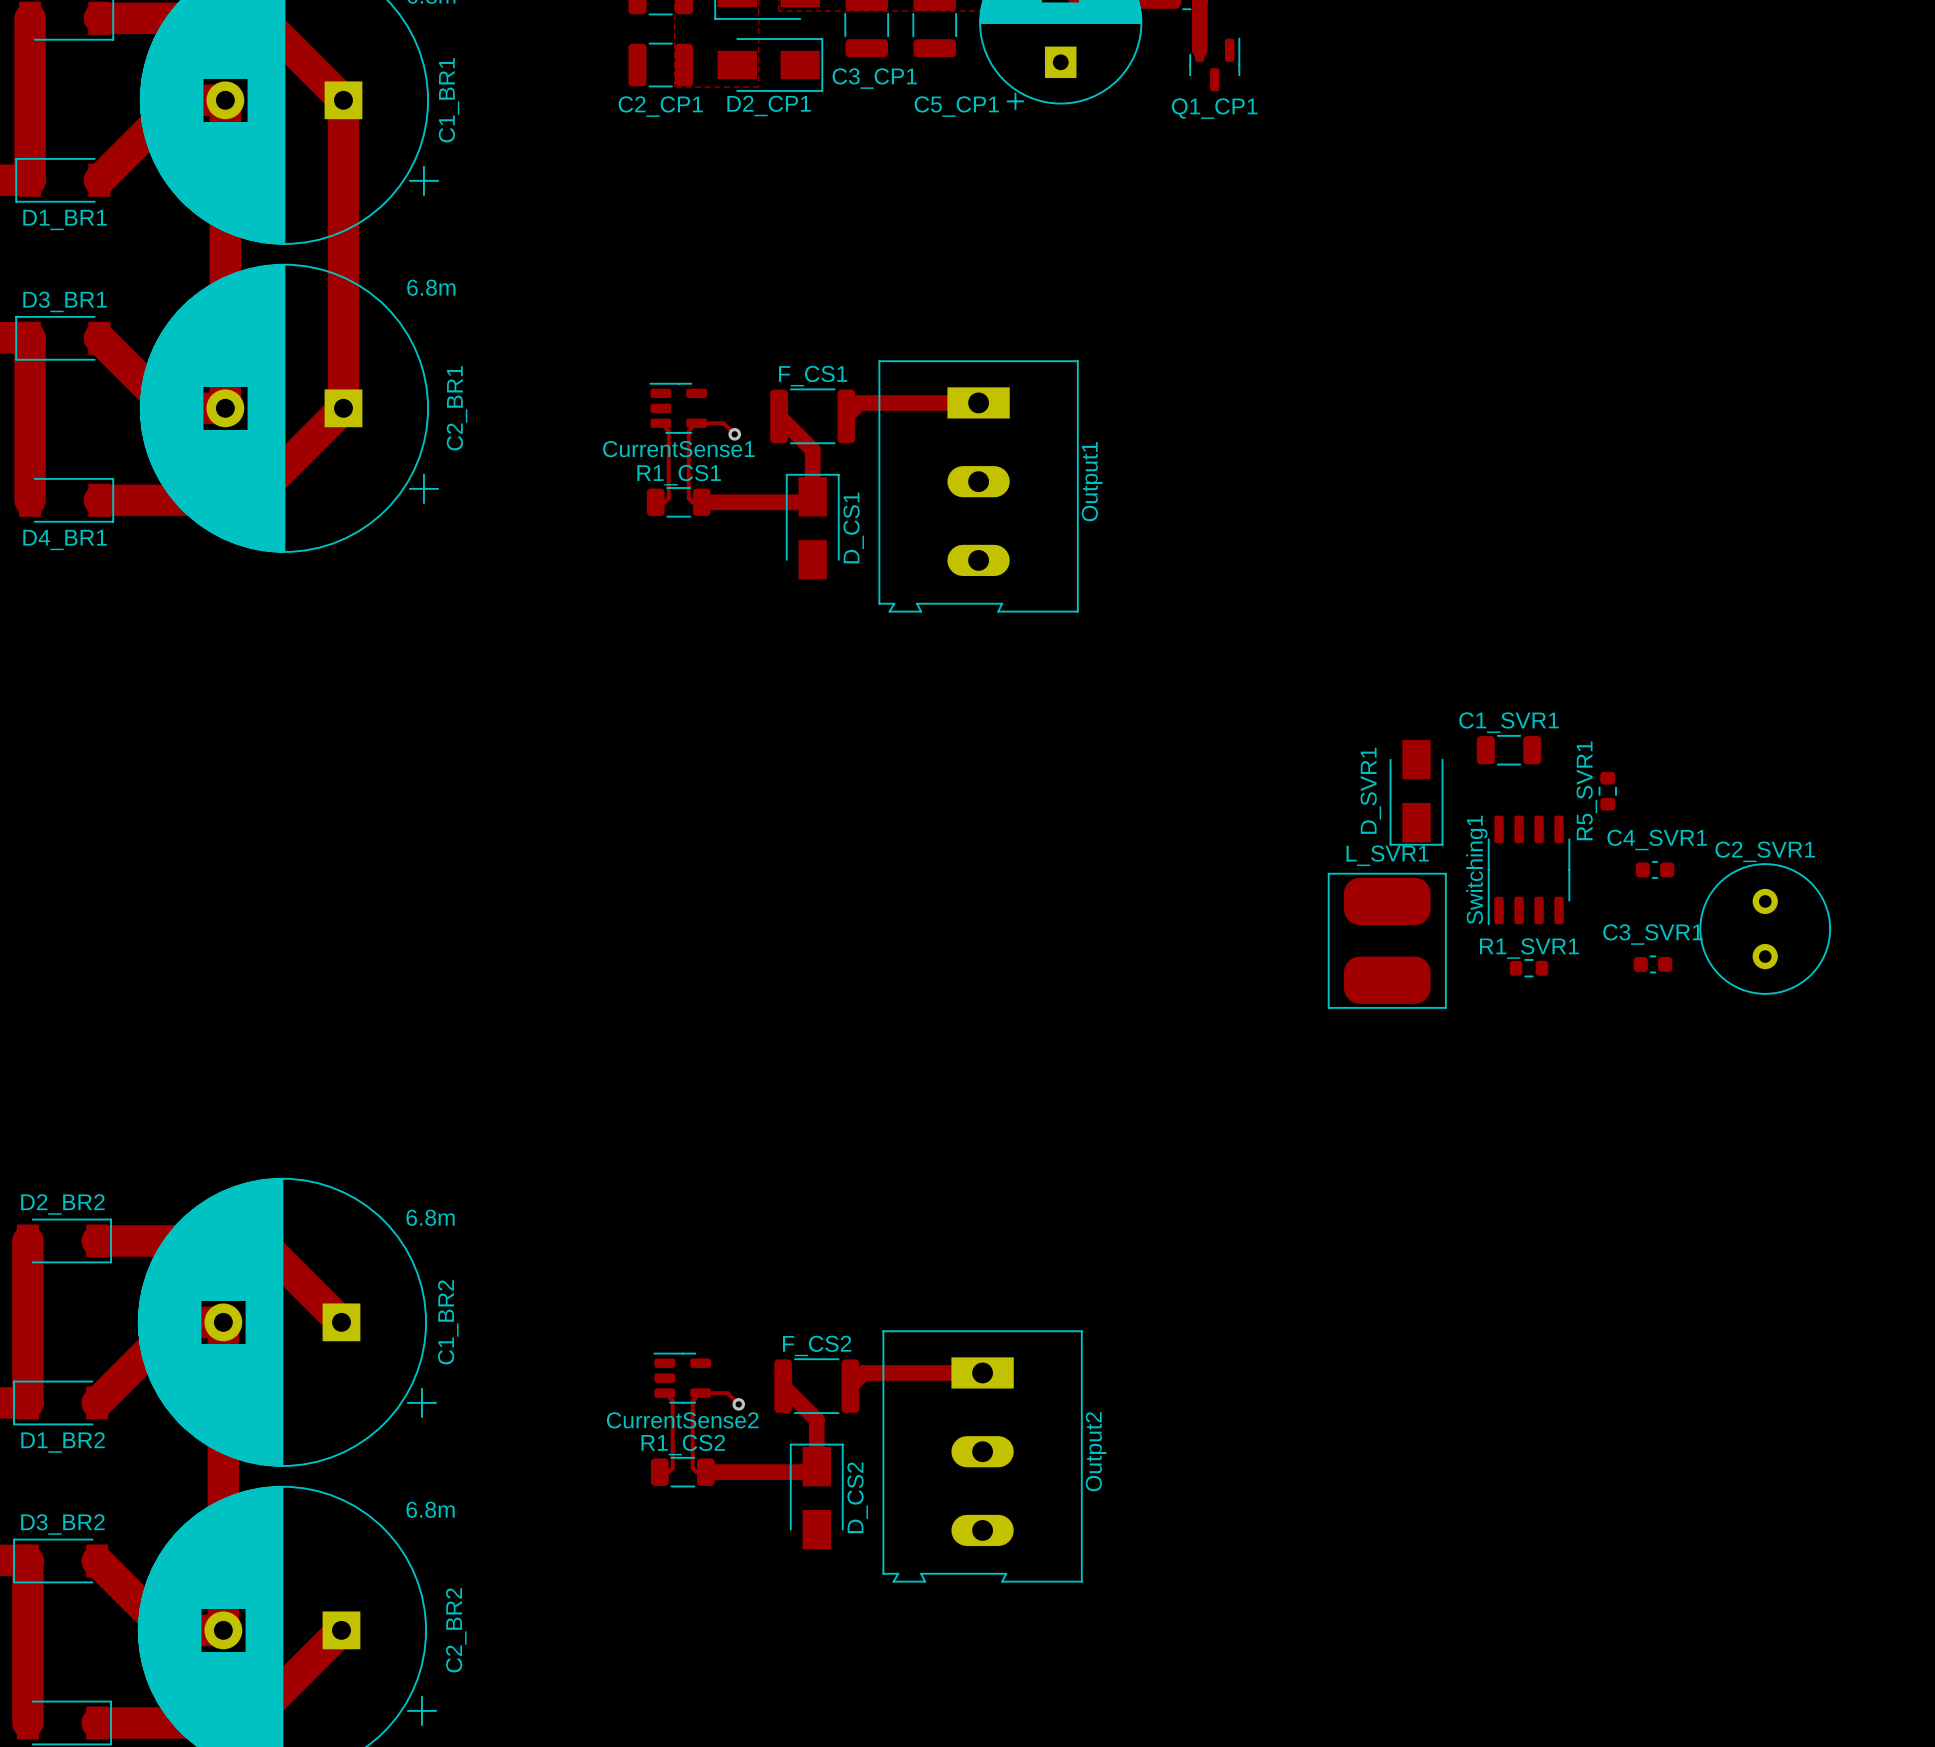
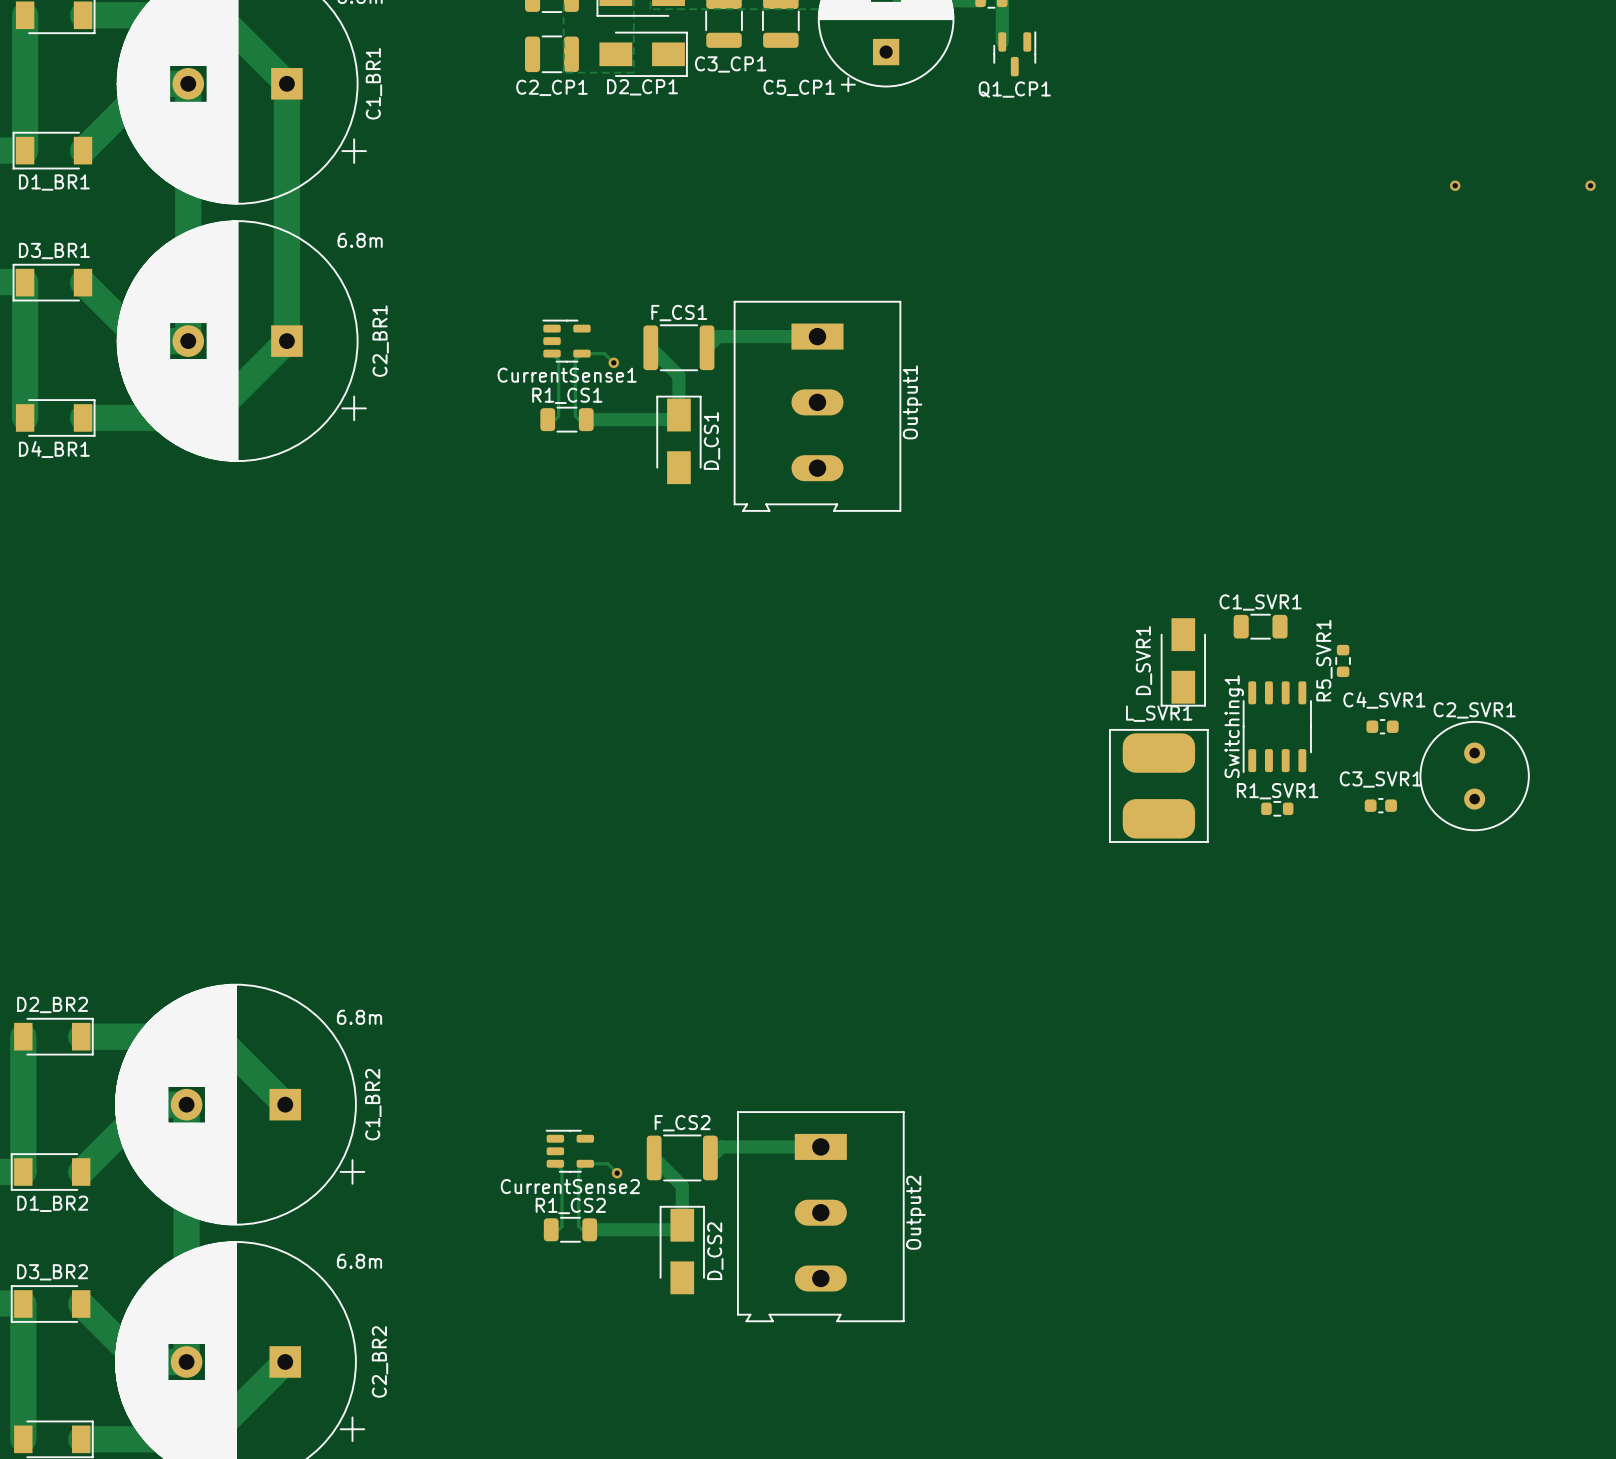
via: none -> (1455, 185)
via: none -> (1590, 185)

